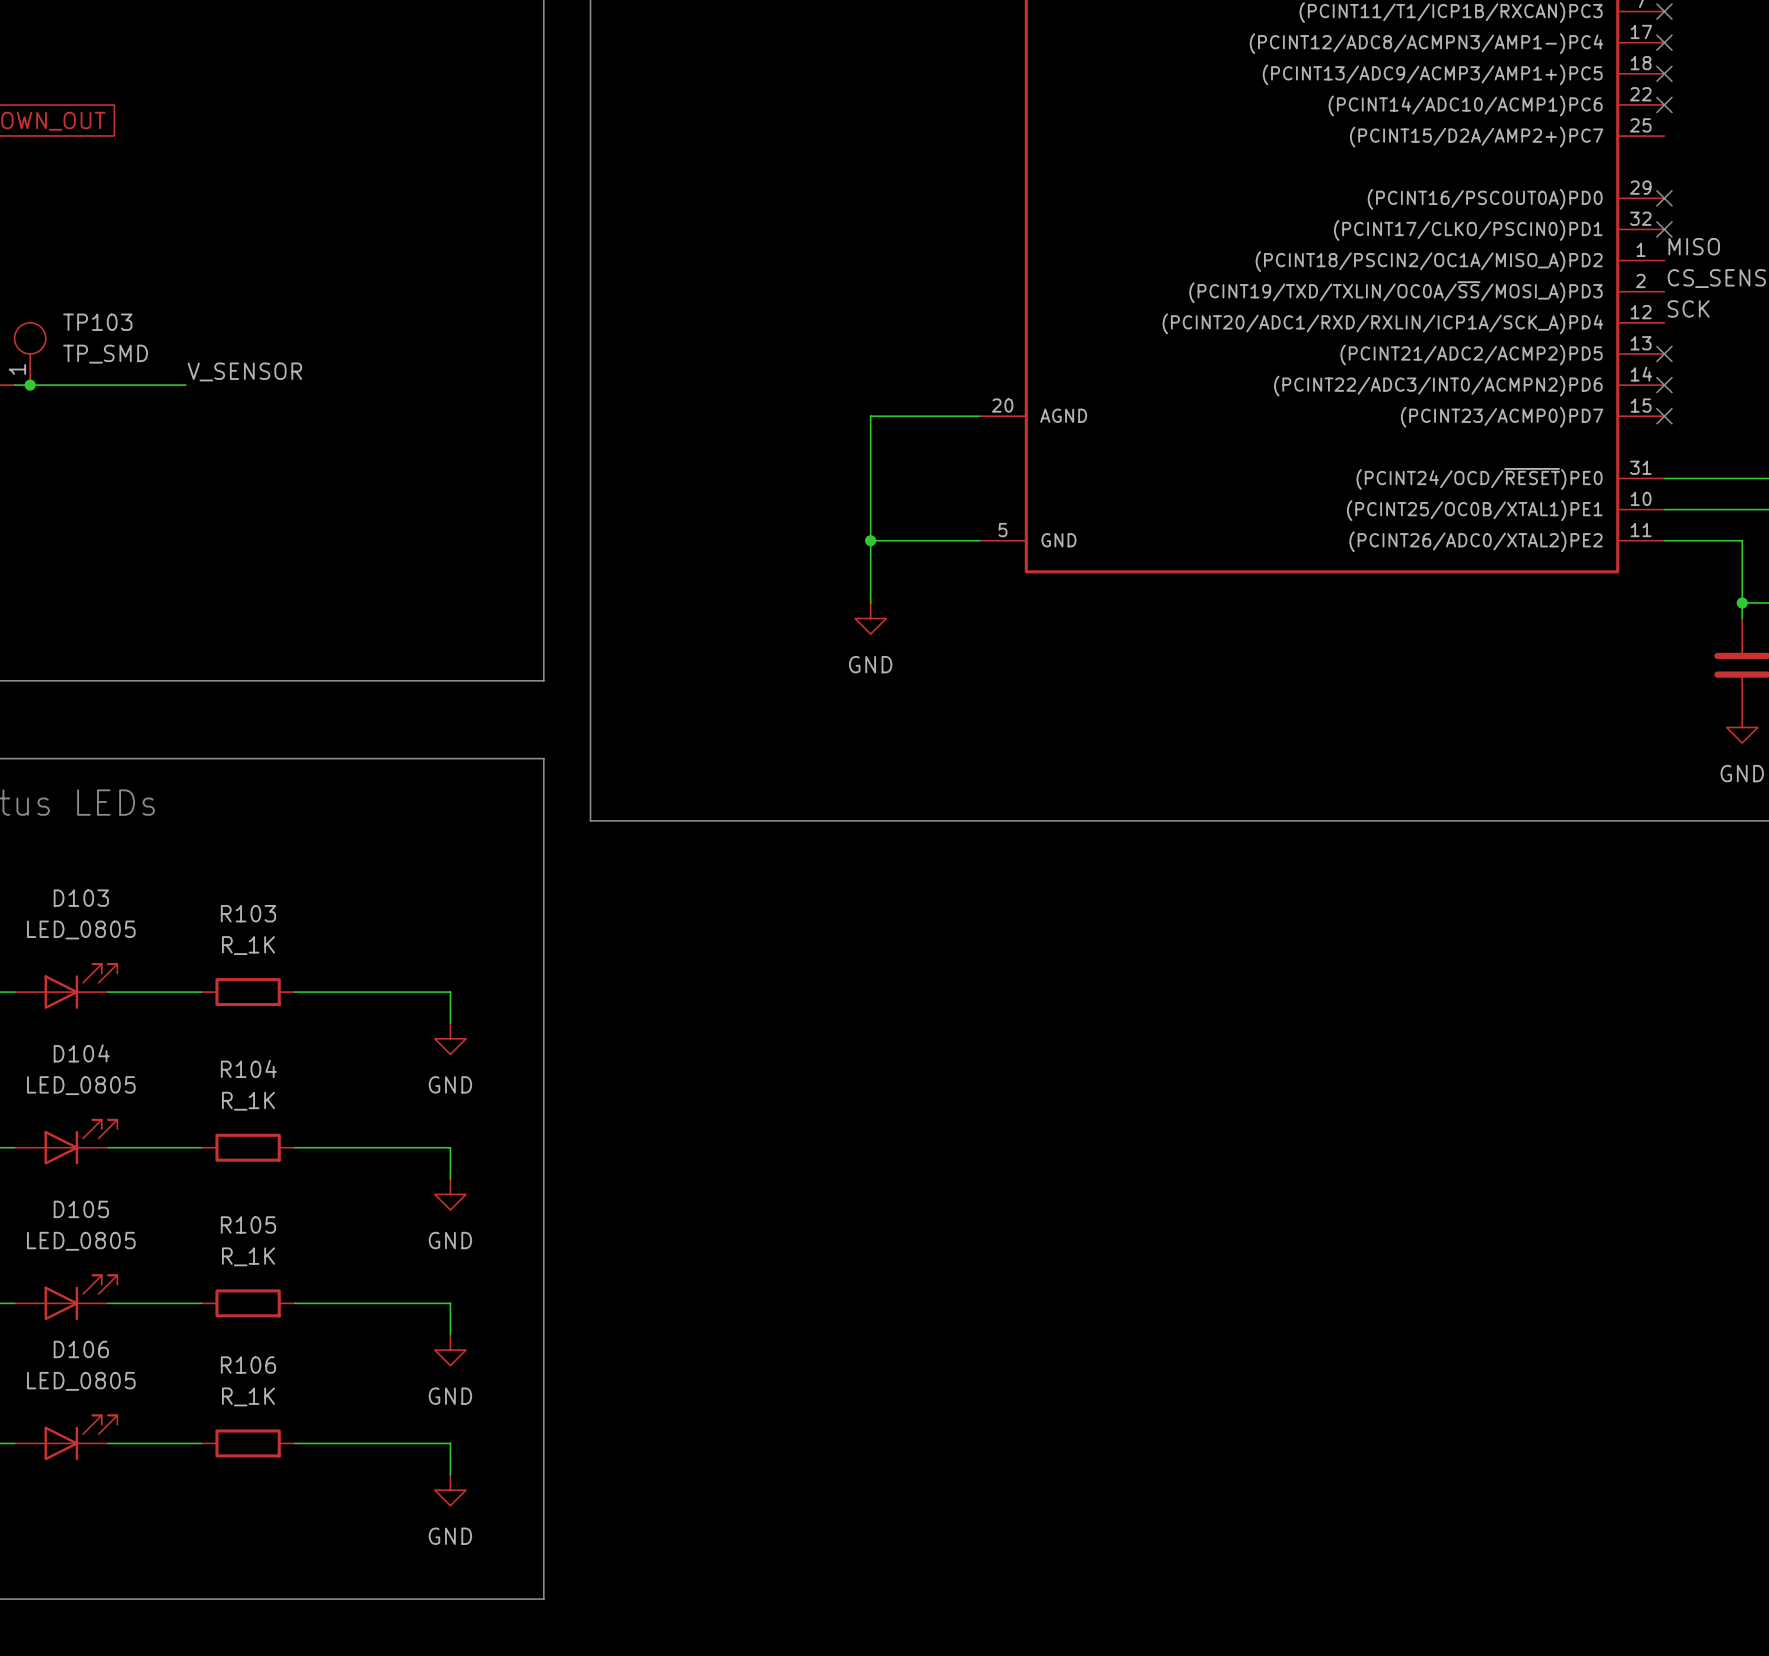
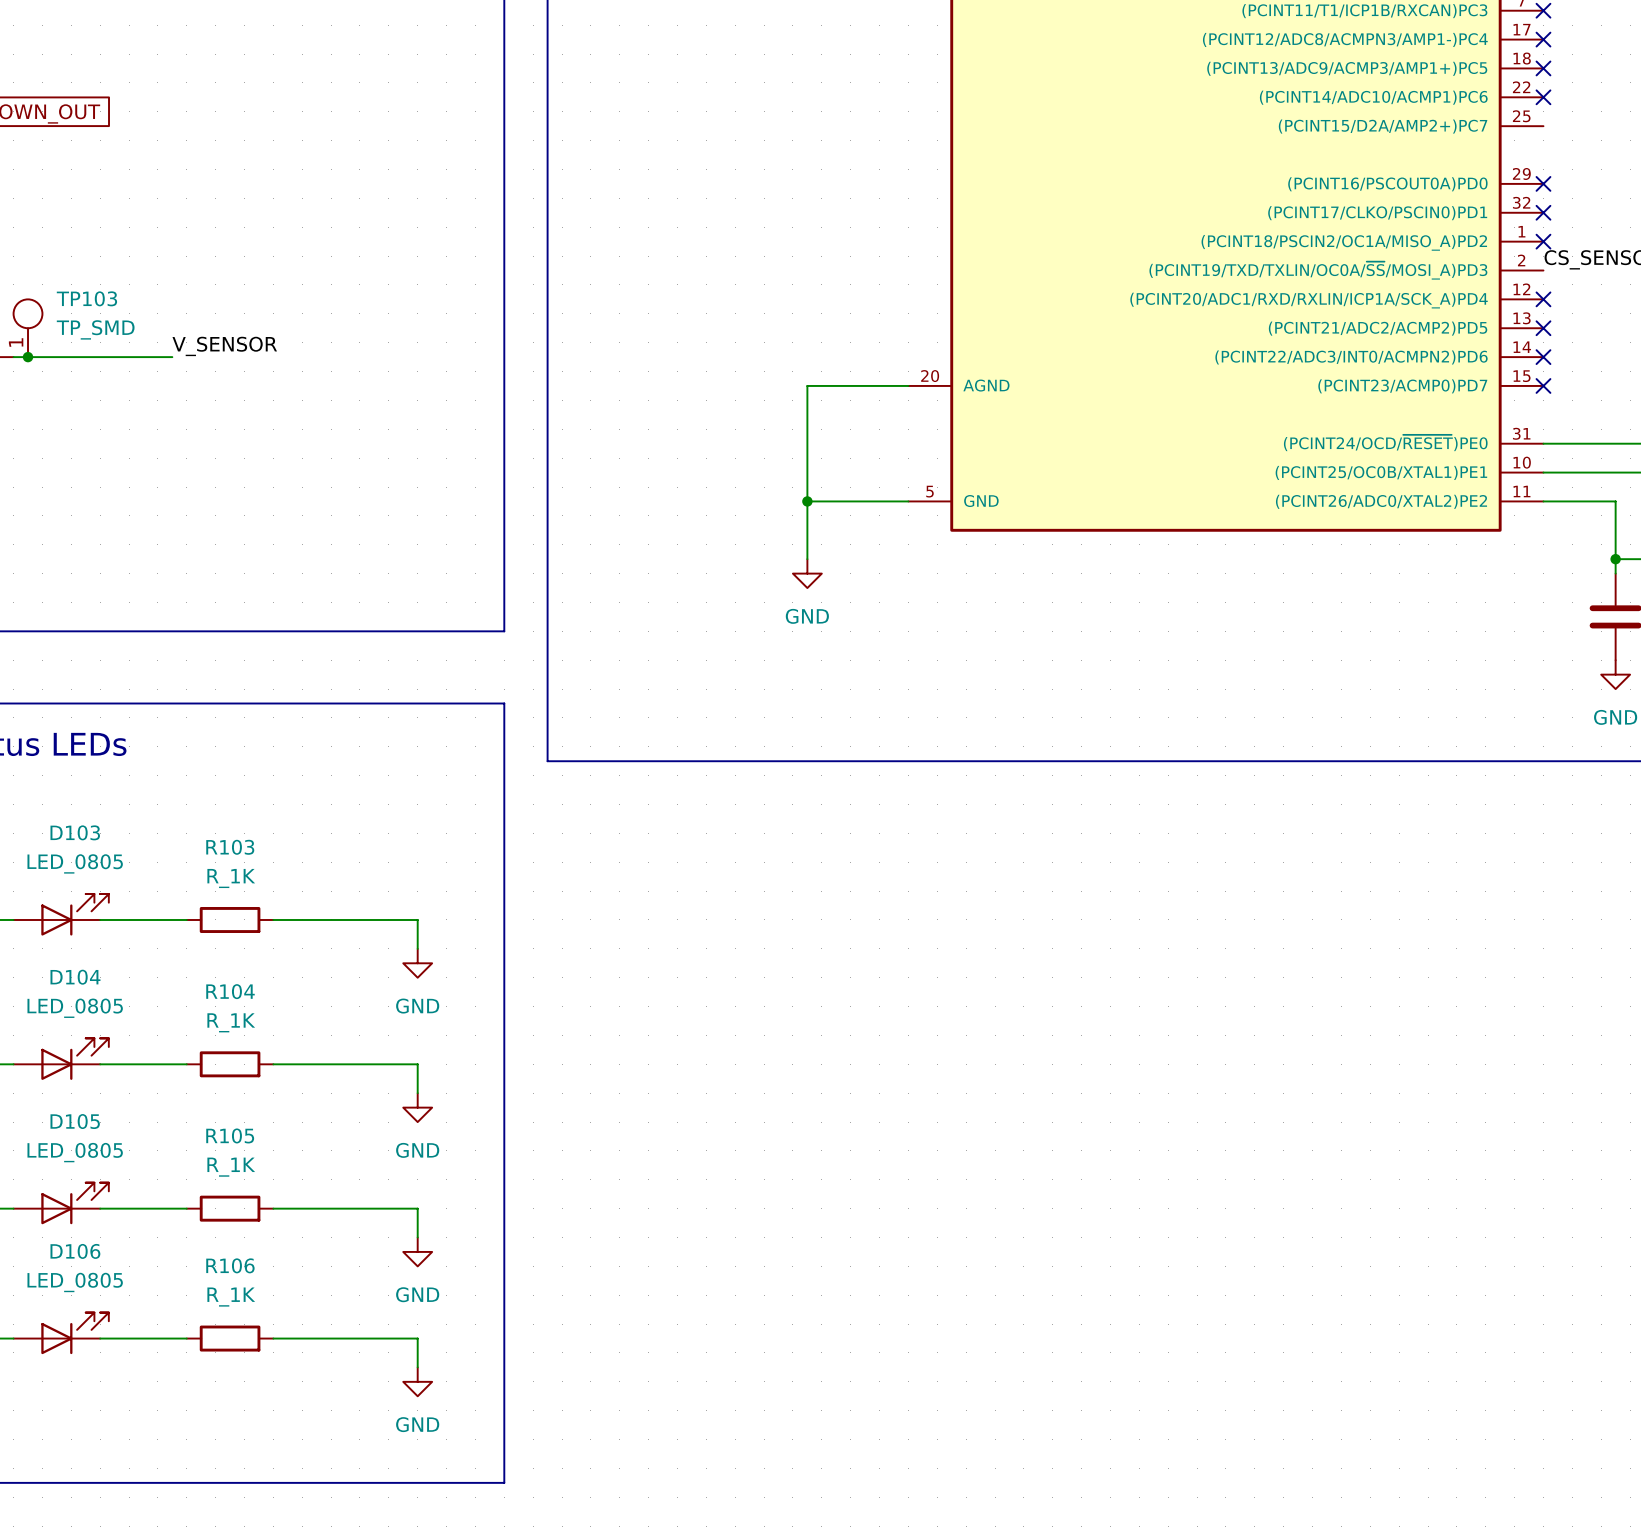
label: MISO (1694, 246) -> none
no-connect mark: none -> (1543, 241)
label: SCK (1688, 308) -> none
no-connect mark: none -> (1543, 299)

